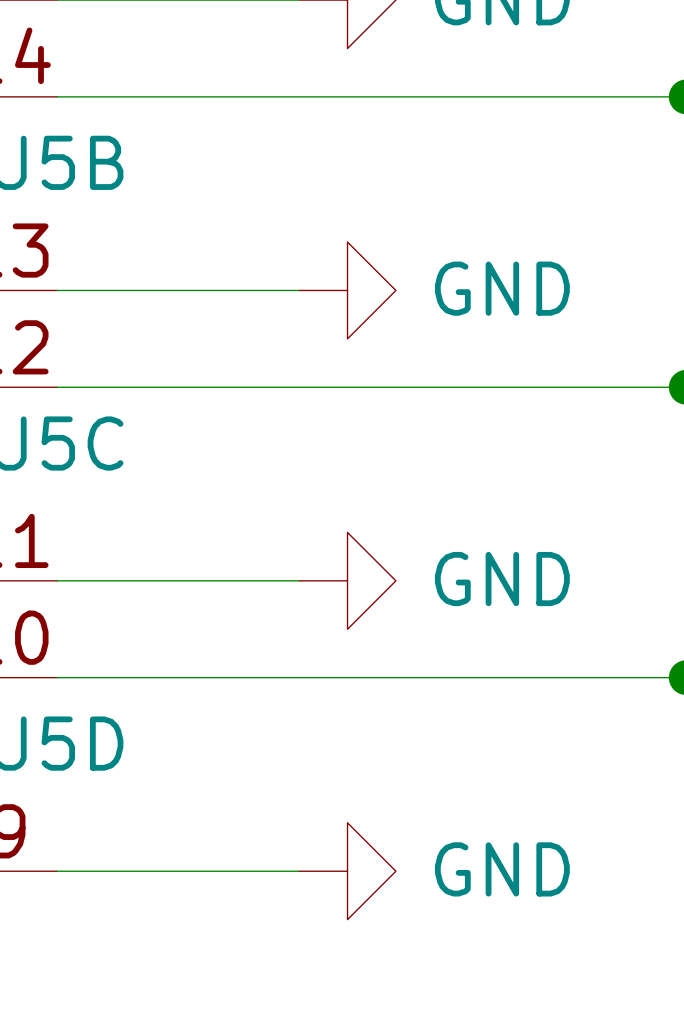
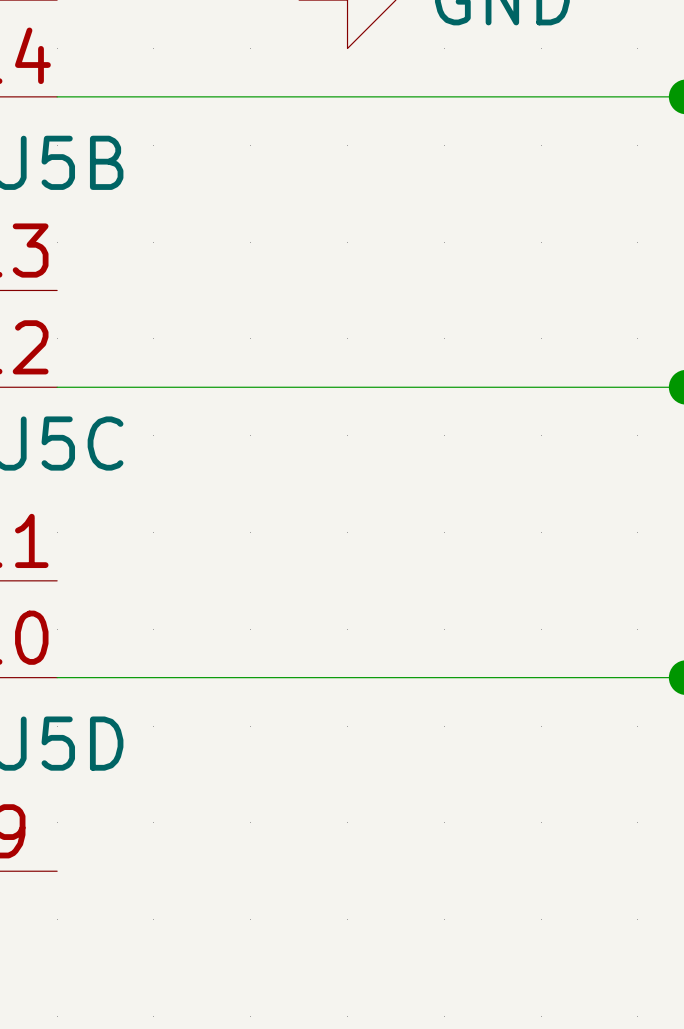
wire: (57, 0) (299, 0) -> none
wire: (57, 290) (299, 290) -> none
power symbol: GND (347, 290) -> none
wire: (57, 580) (299, 580) -> none
power symbol: GND (347, 580) -> none
wire: (57, 871) (299, 871) -> none
power symbol: GND (347, 871) -> none

